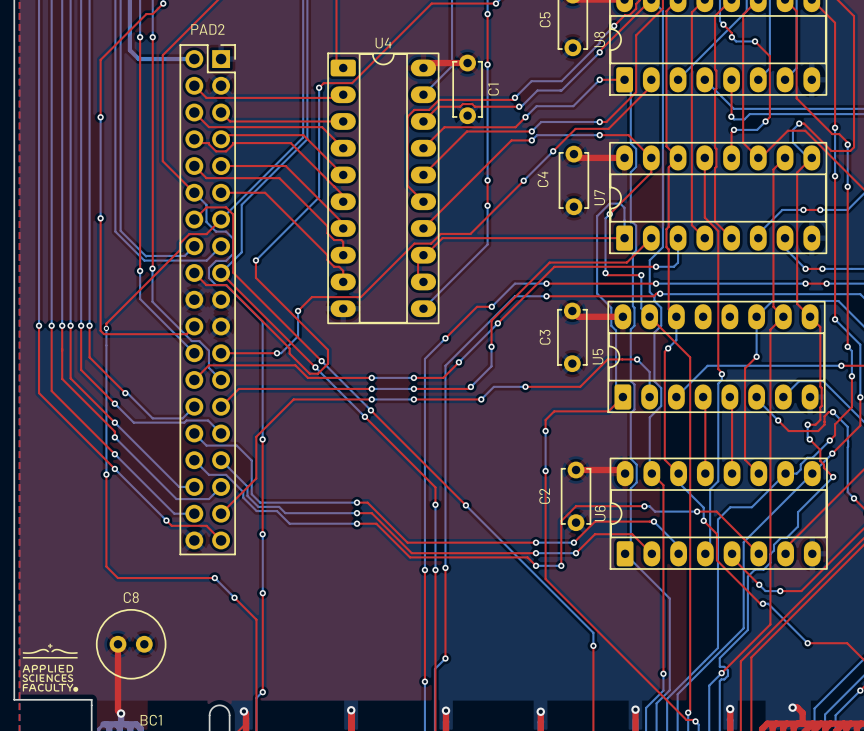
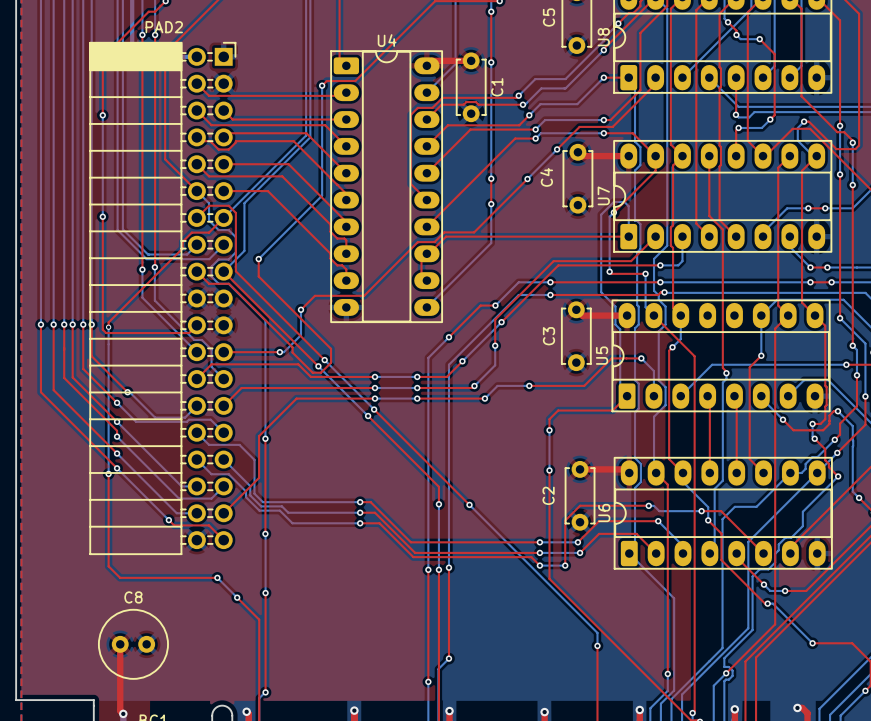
PAD2 footprint: [179, 44, 236, 556] -> [89, 42, 237, 555]
drawing: [22, 643, 79, 692] -> none

